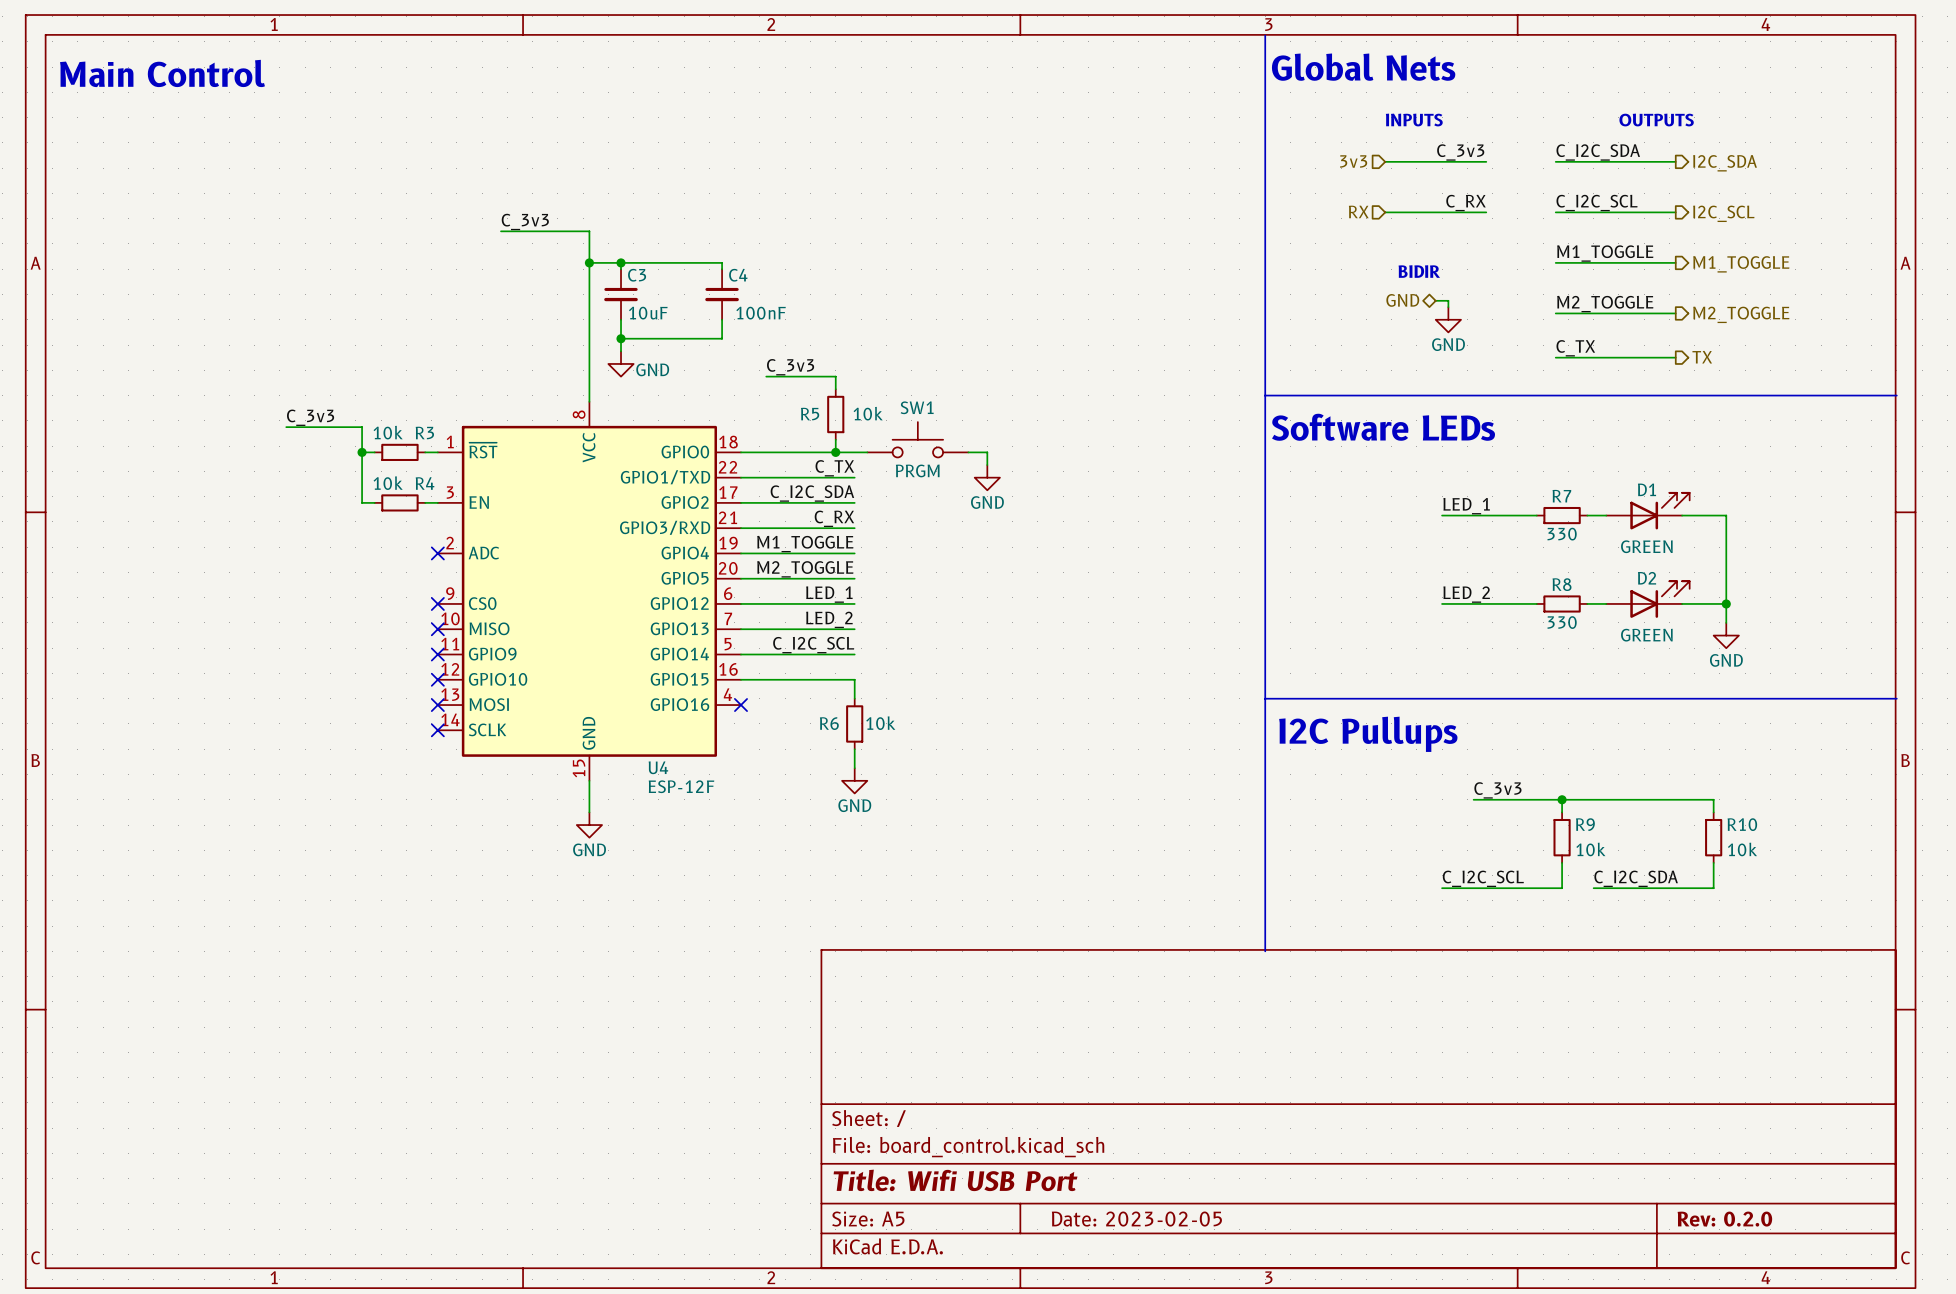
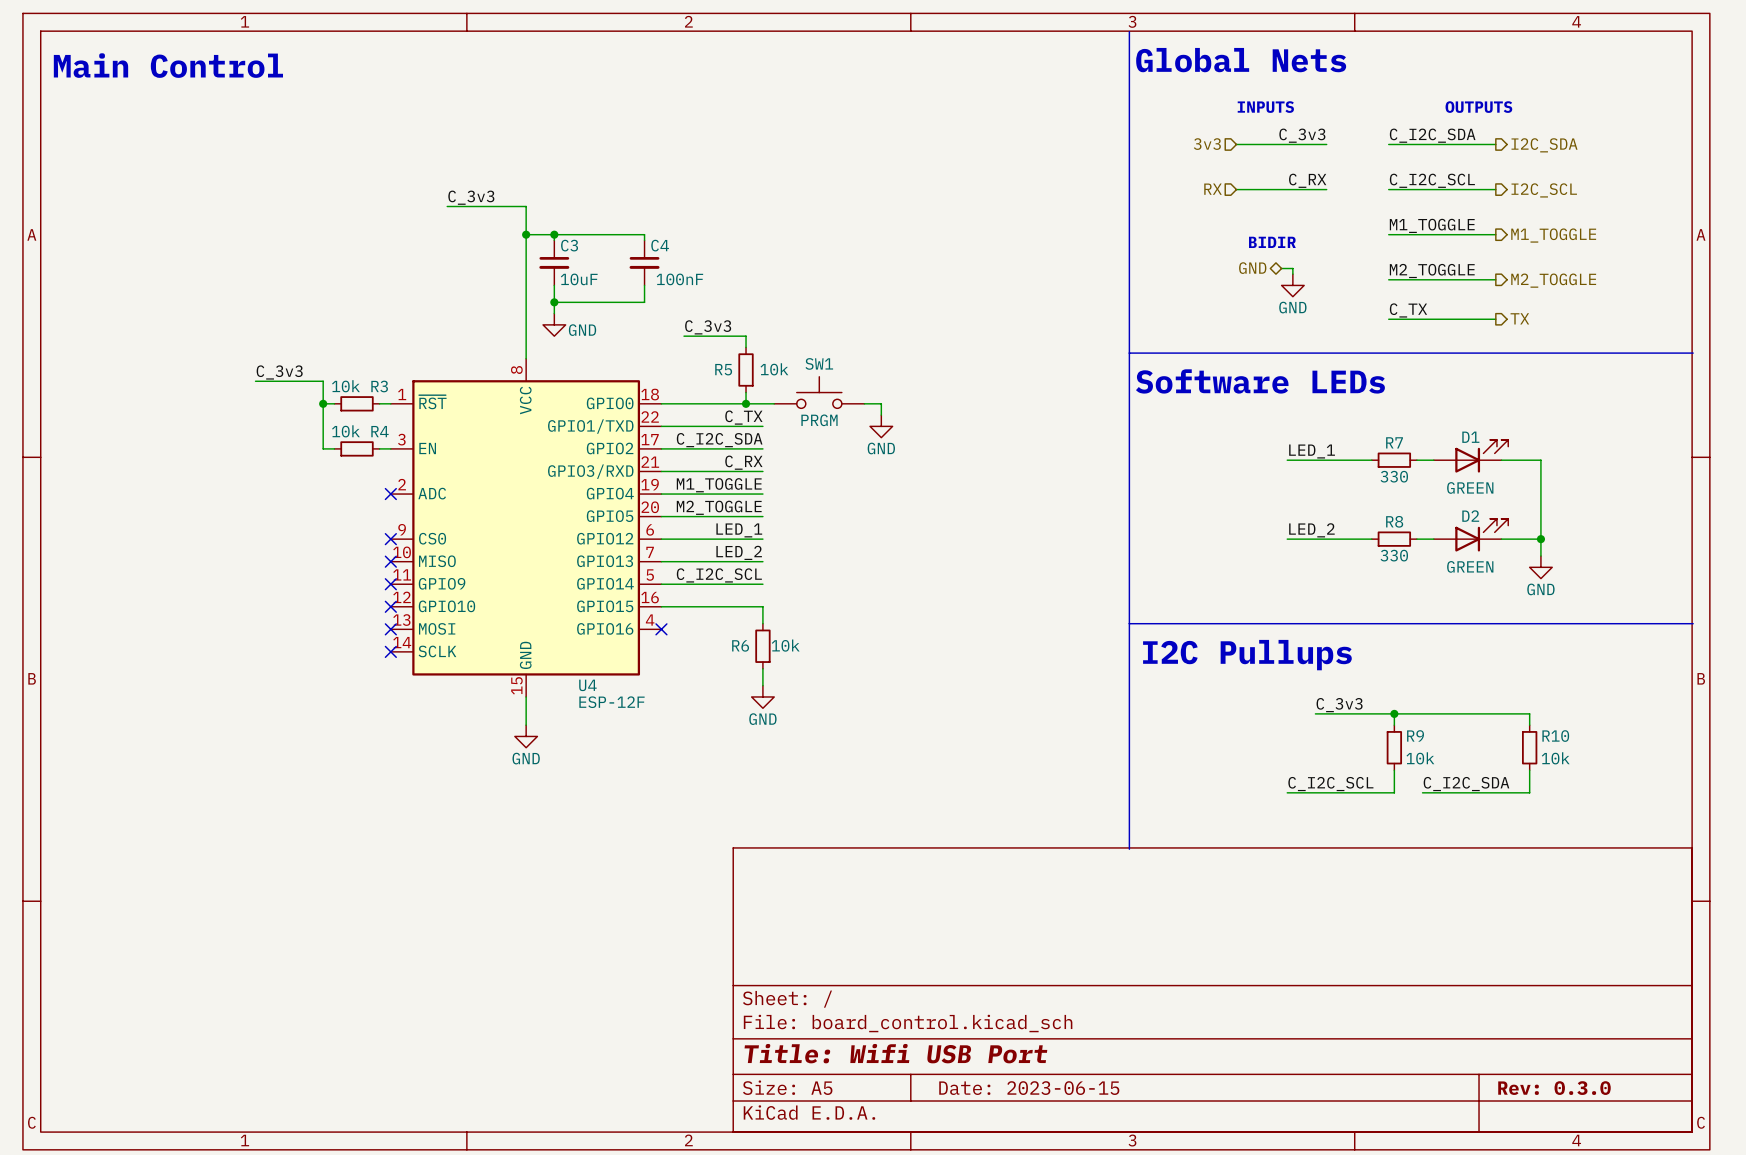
title block: Date: 2023-02-05 (1136, 1219) -> Date: 2023-06-15 (1029, 1088)
title block: Rev: 0.2.0 (1724, 1219) -> Rev: 0.3.0 (1554, 1088)

